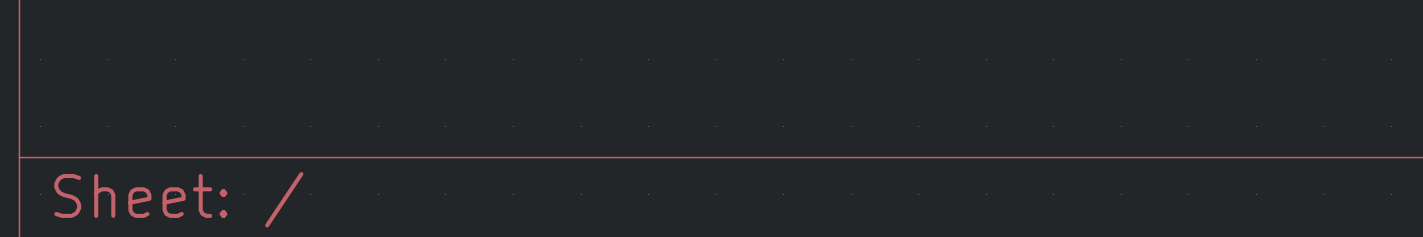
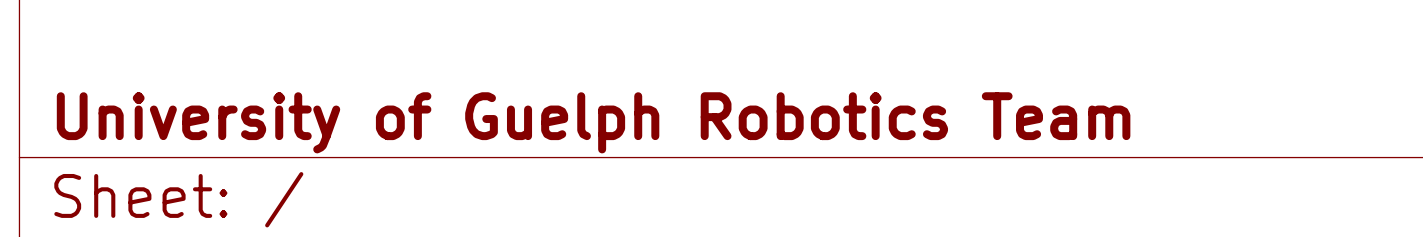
title block: none -> University of Guelph Robotics Team (593, 122)

